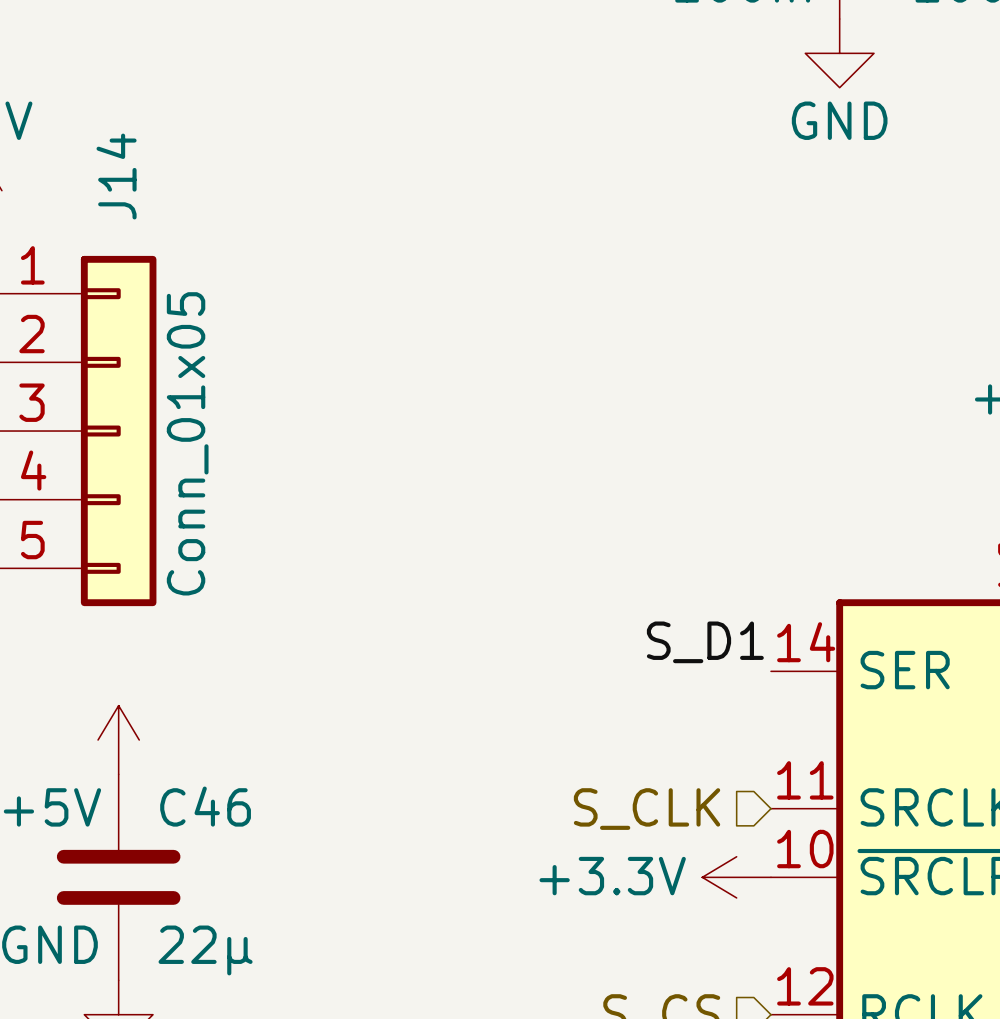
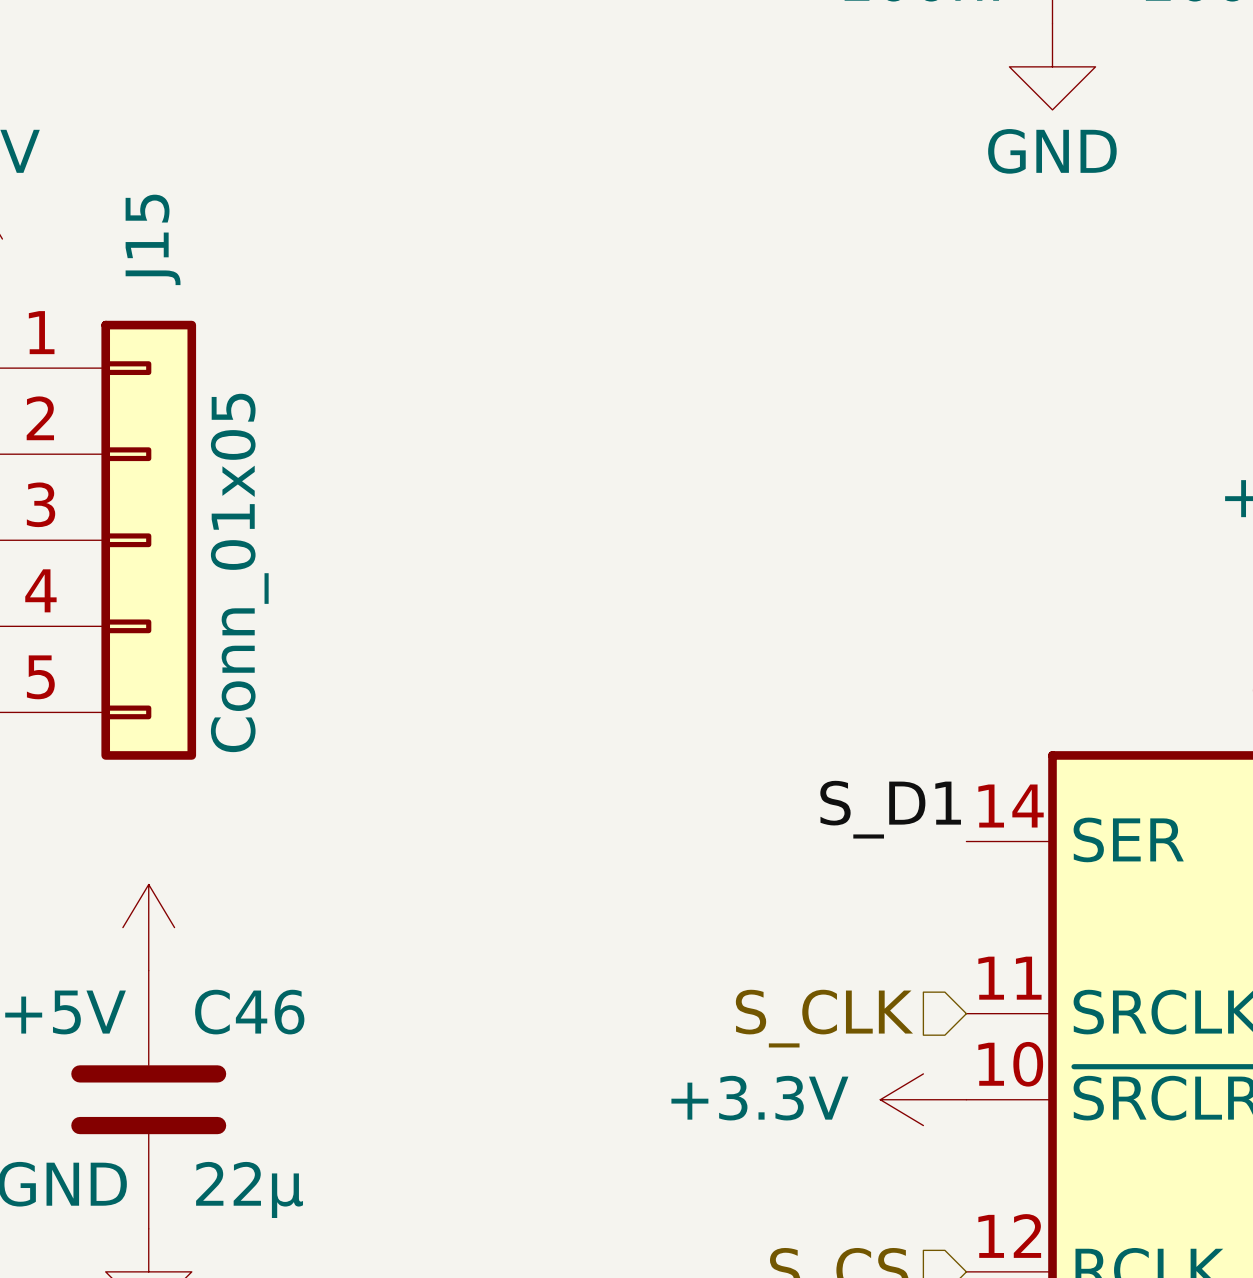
J14 name: J14 (116, 176) -> J15 (153, 239)

